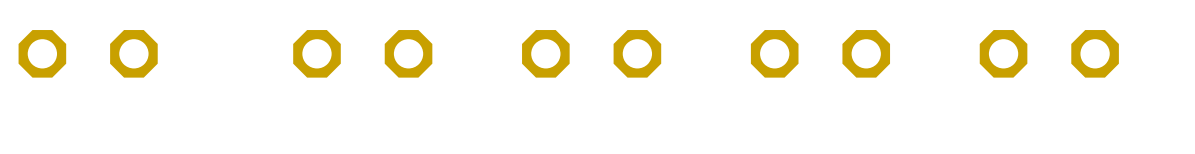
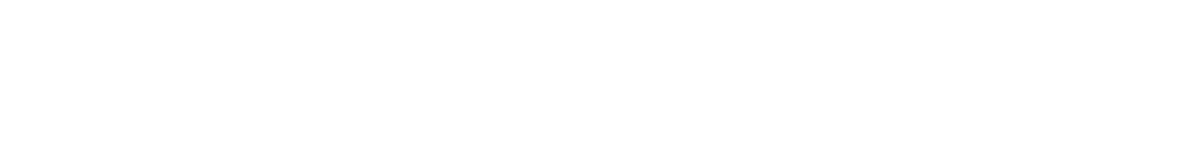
part: (88, 53) -> none
part: (362, 53) -> none
part: (591, 53) -> none
part: (820, 53) -> none
part: (1049, 53) -> none

